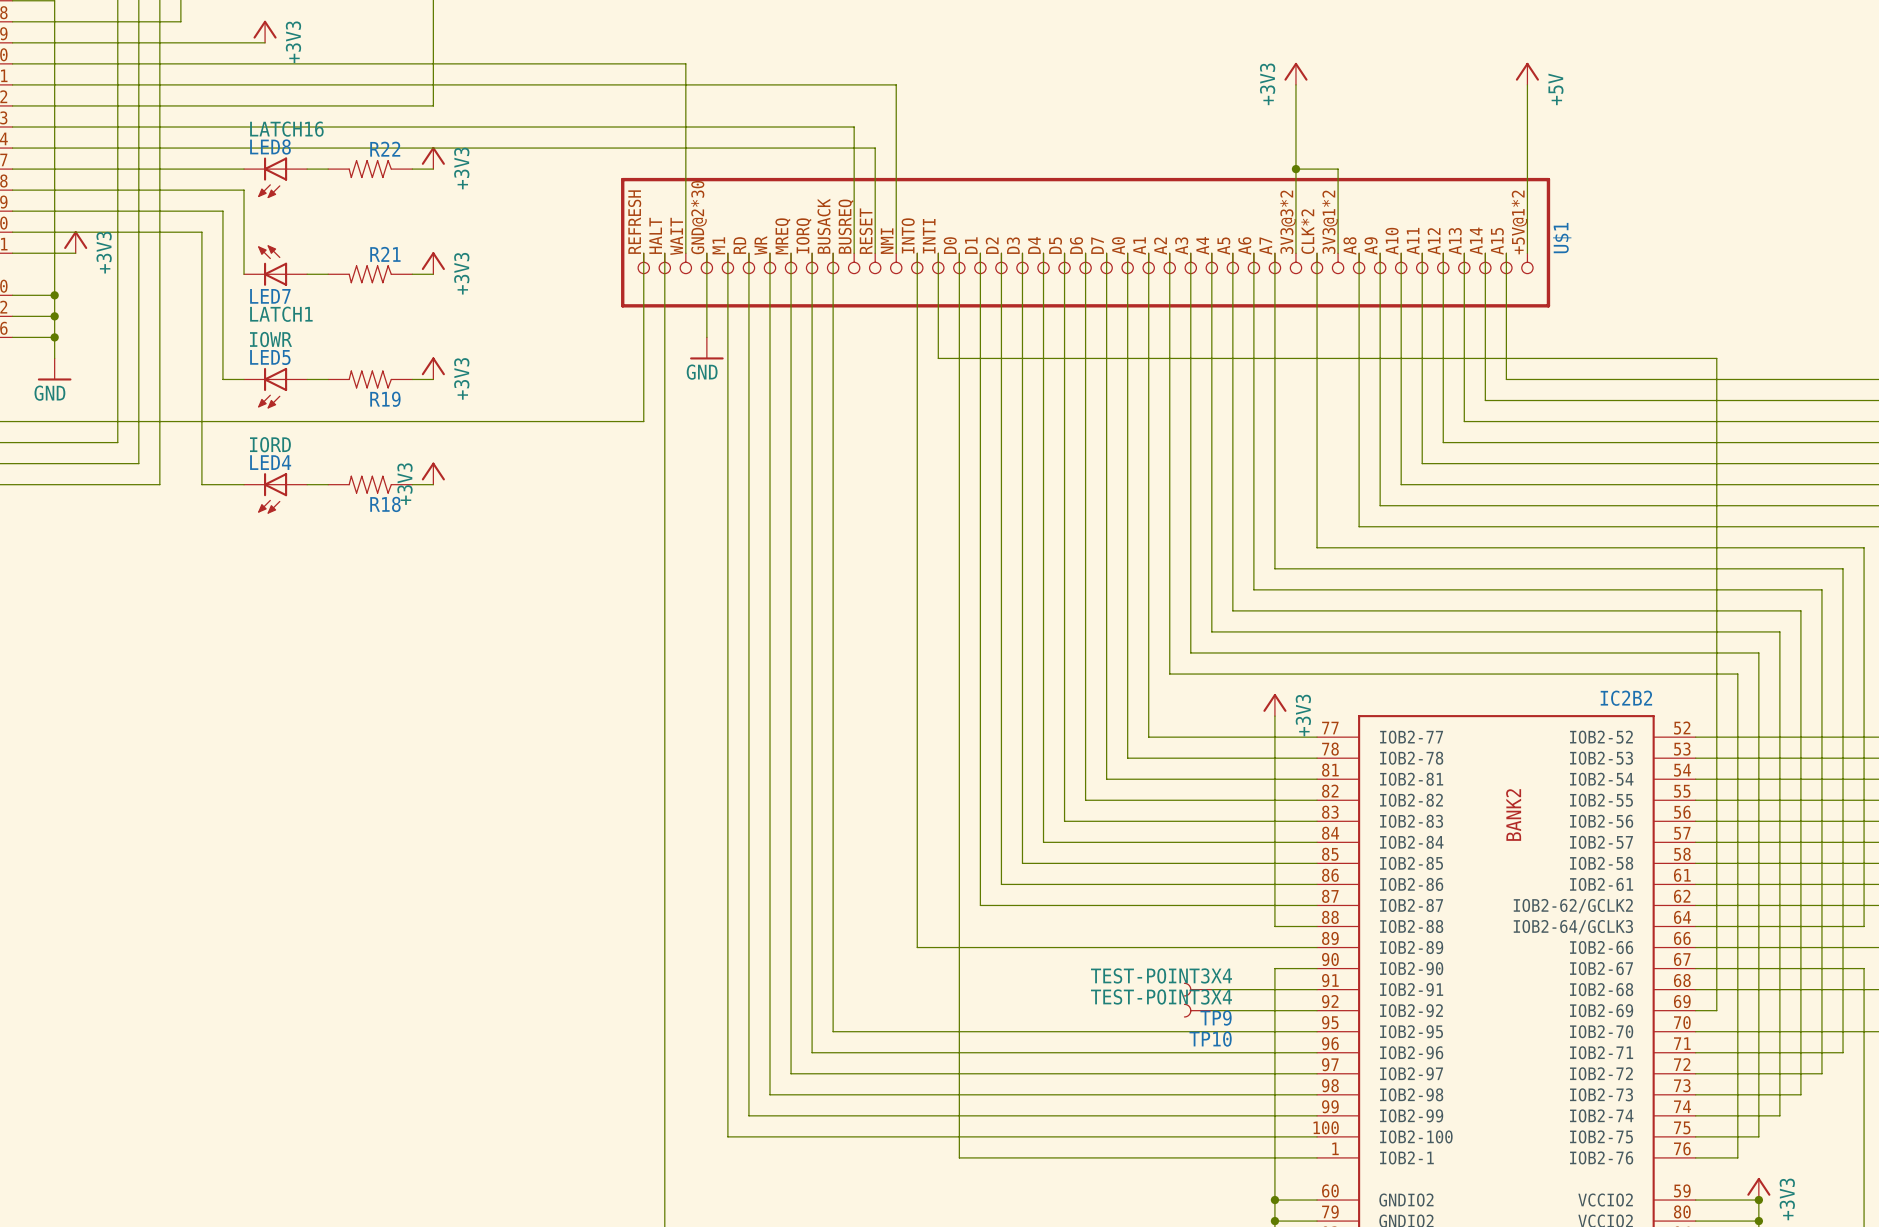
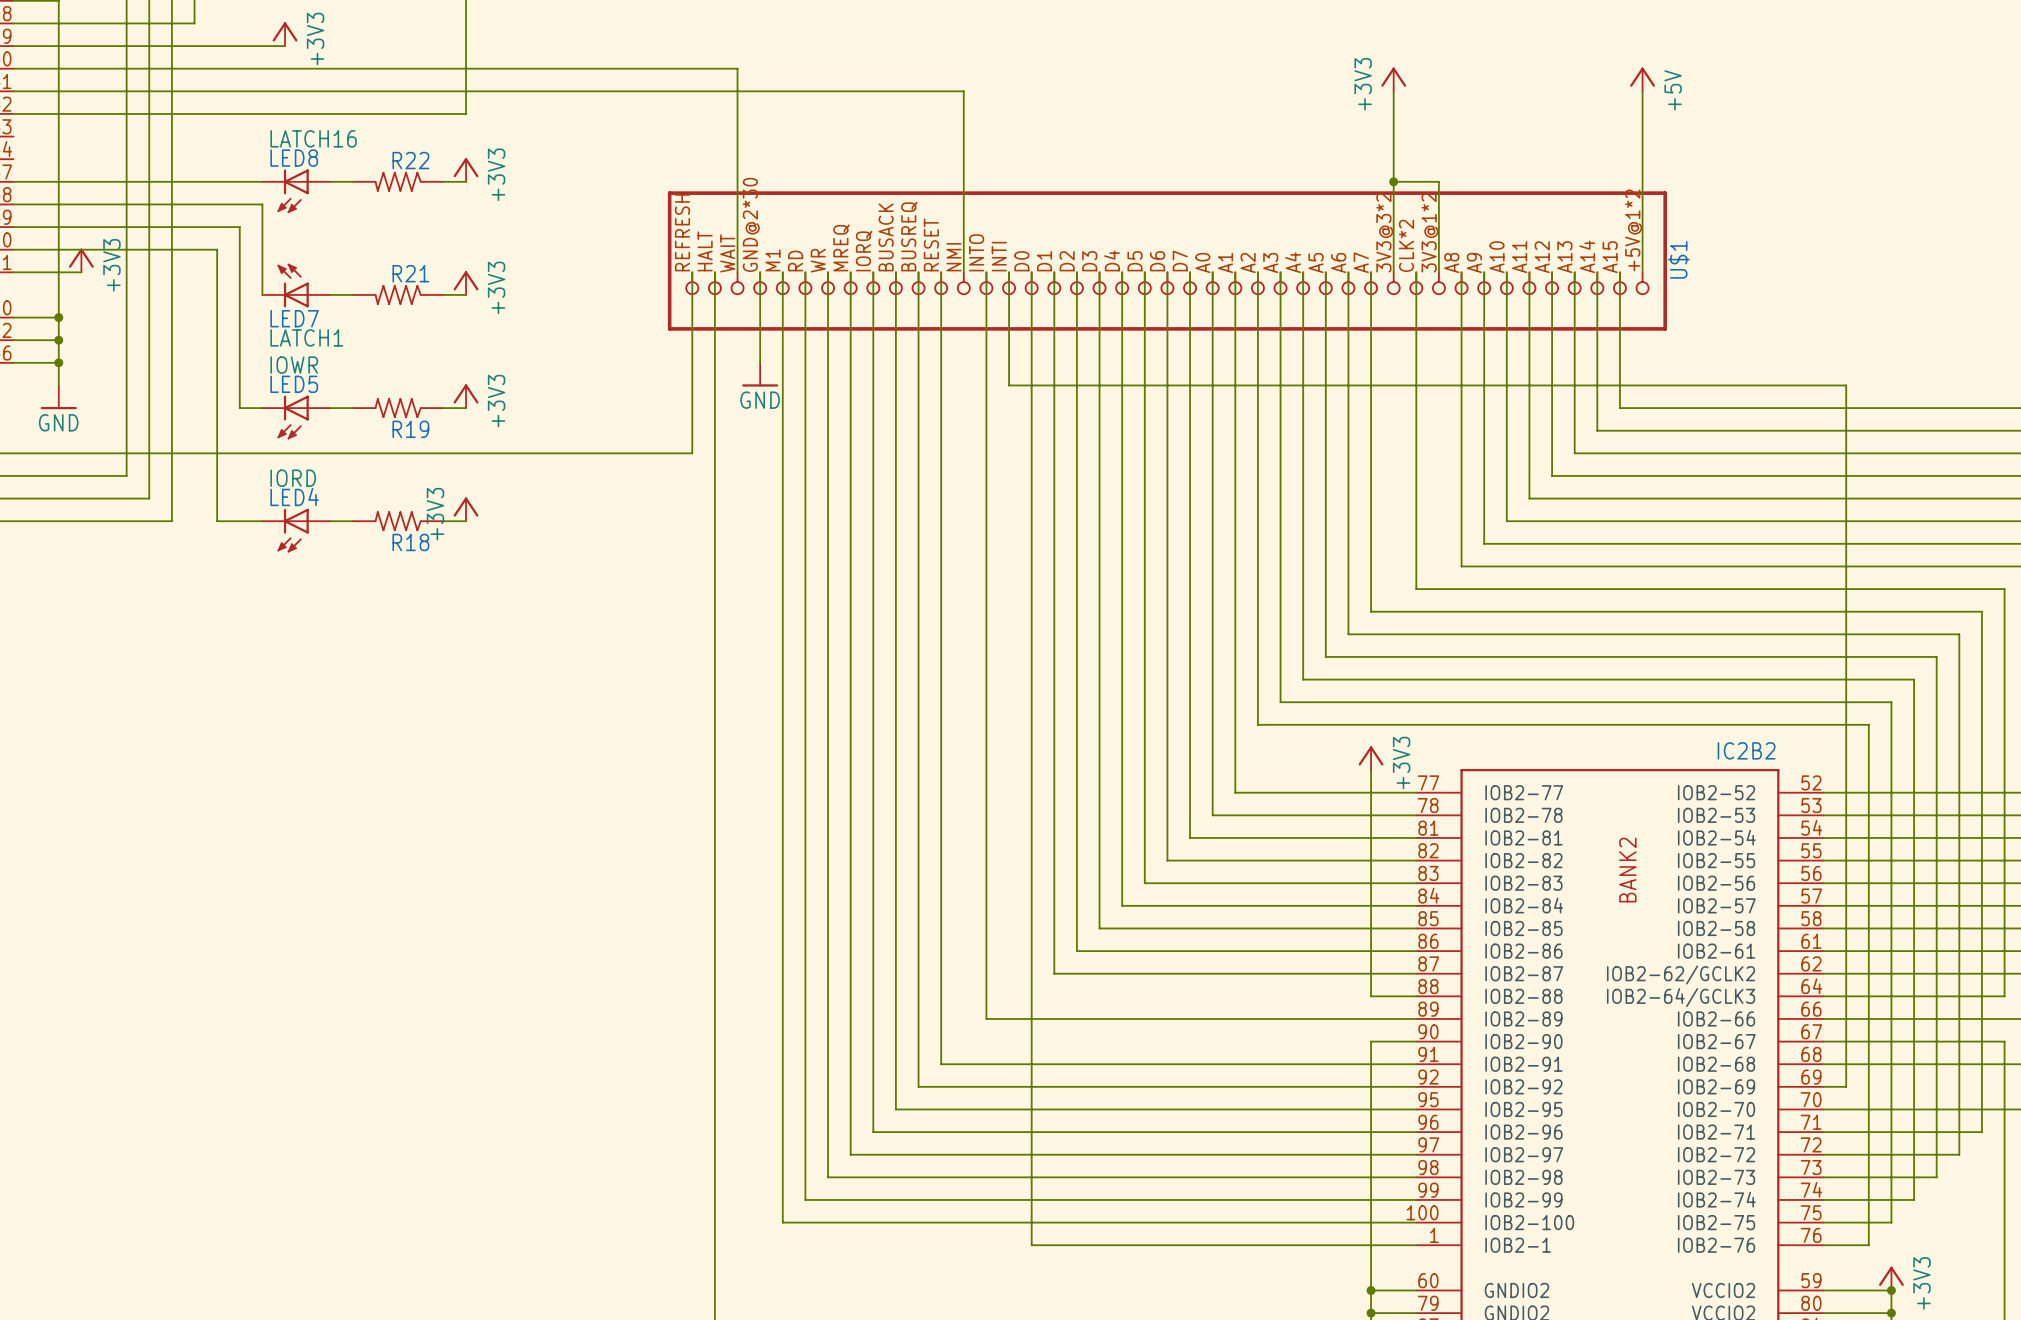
wire: (12, 127) (854, 127) (854, 253) -> (1303, 1086) (918, 1086) (918, 272)
wire: (12, 148) (875, 148) (875, 253) -> (1303, 1064) (941, 1064) (941, 272)
TP9: TEST-POINT3X4 (1198, 989) -> none
TP10: TEST-POINT3X4 (1198, 1010) -> none

